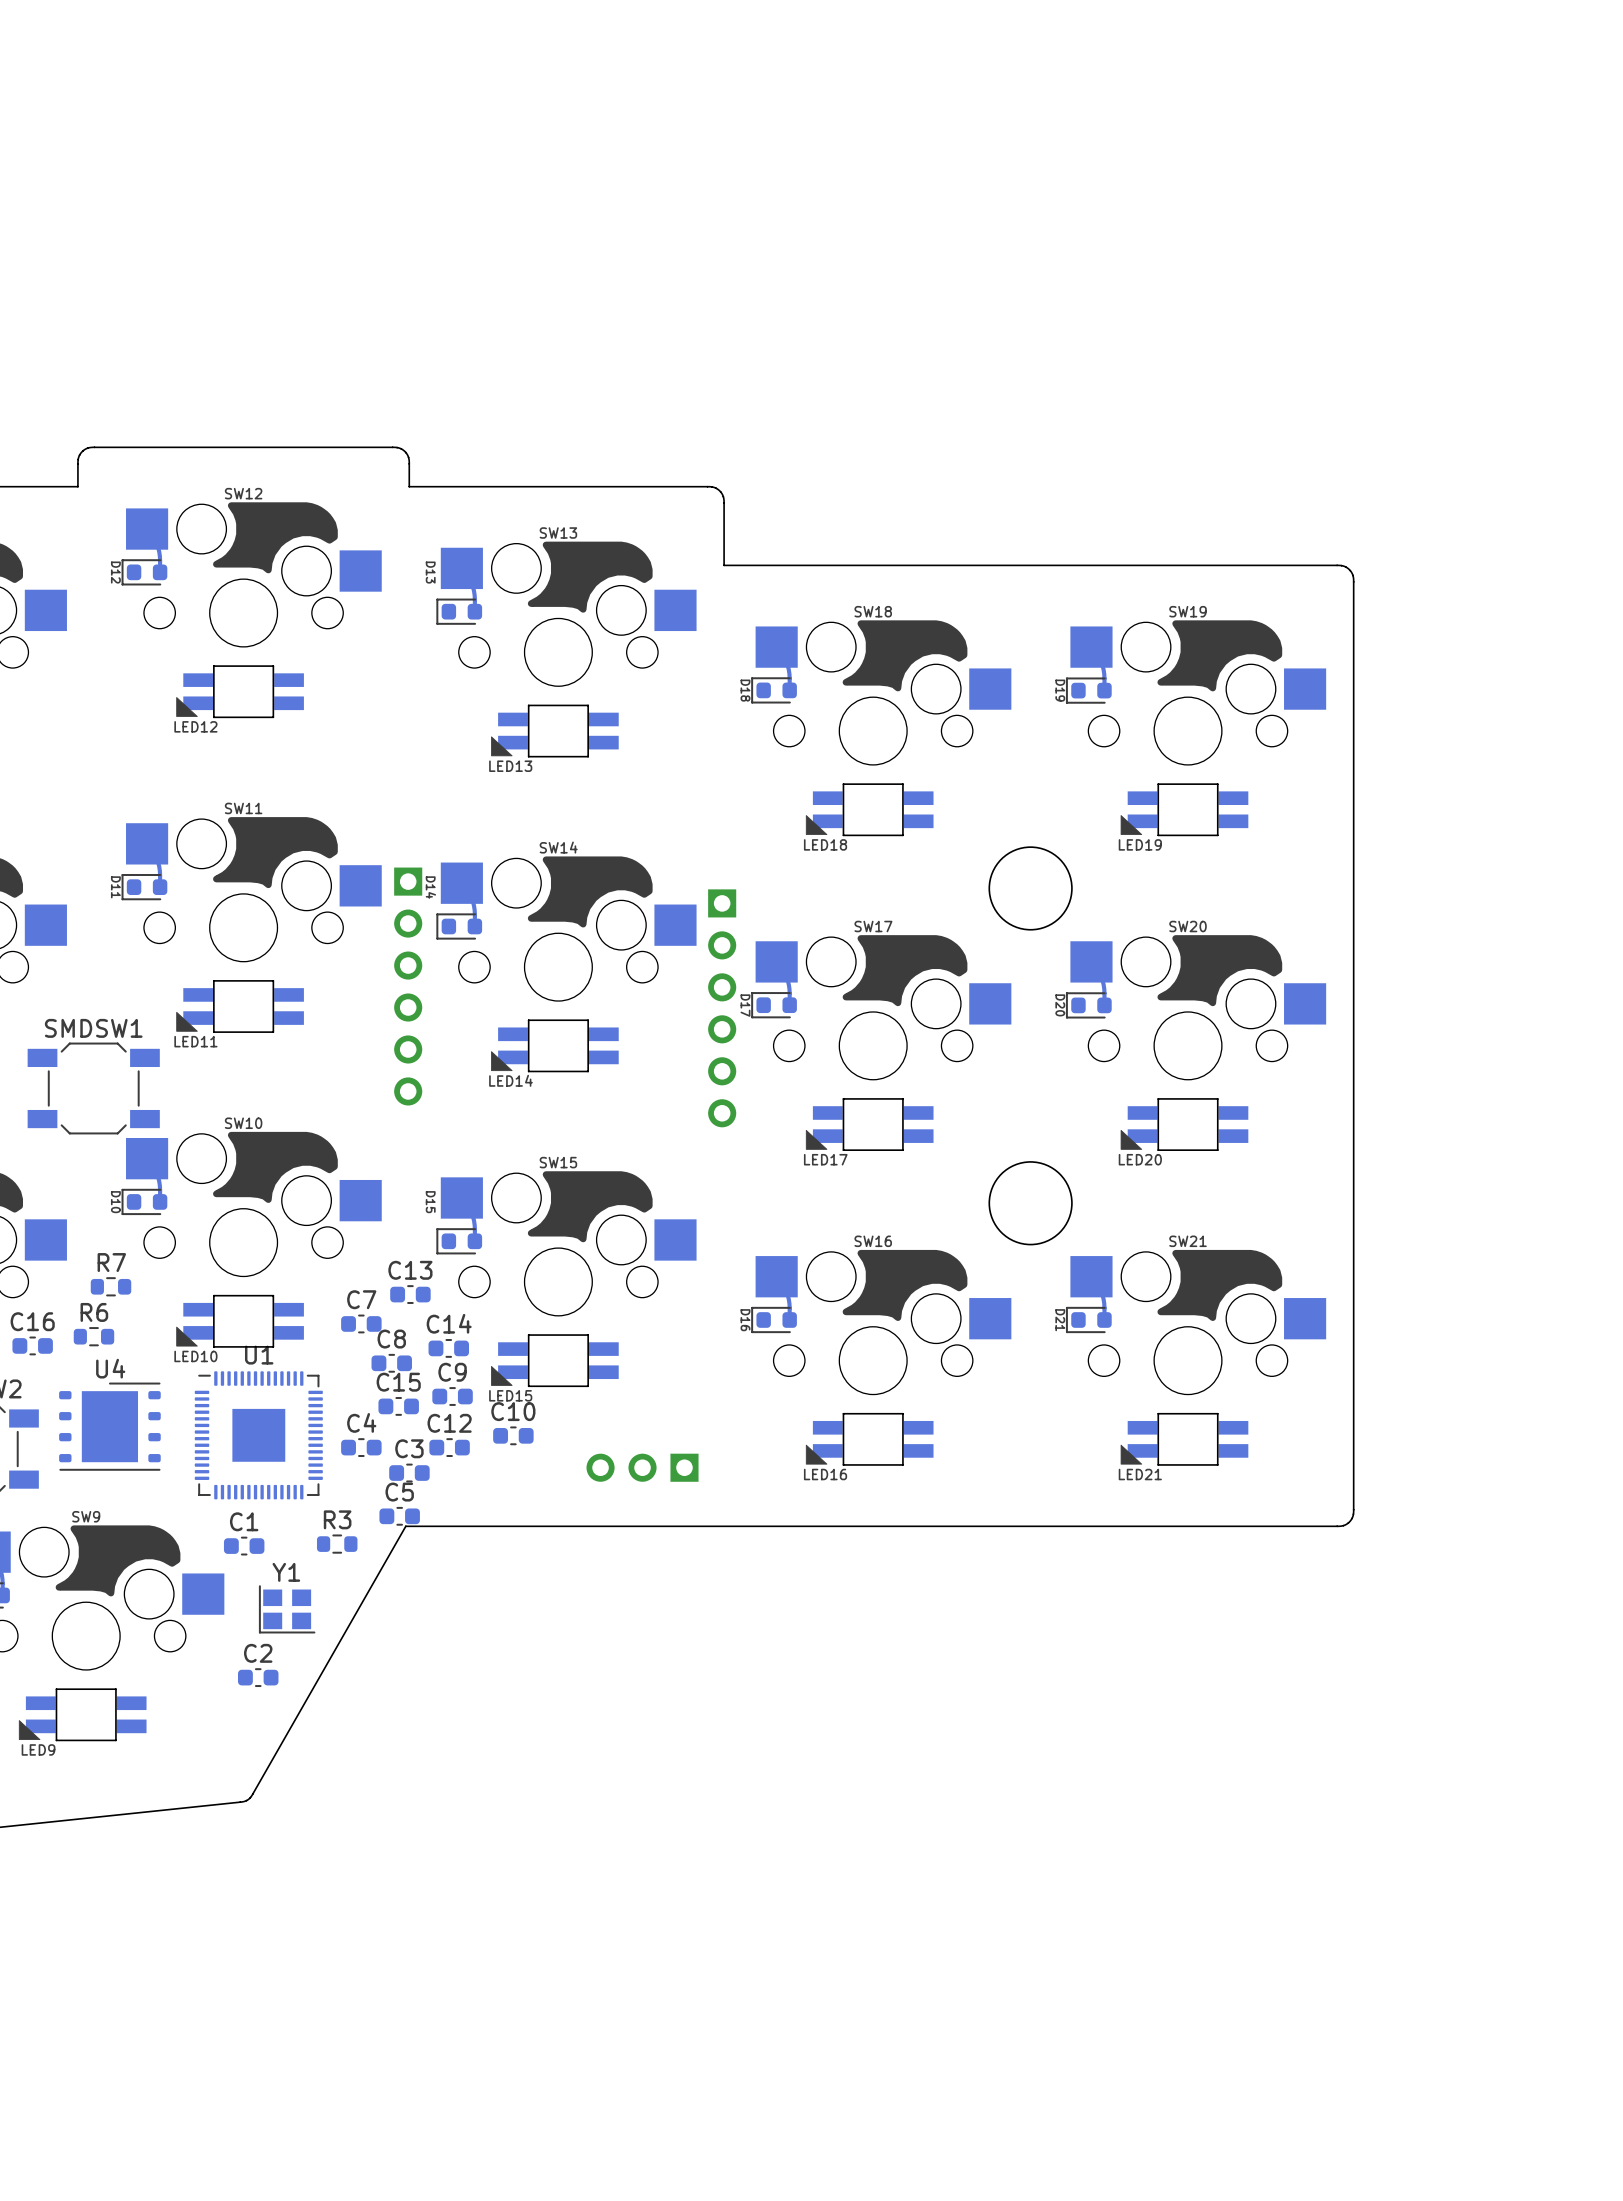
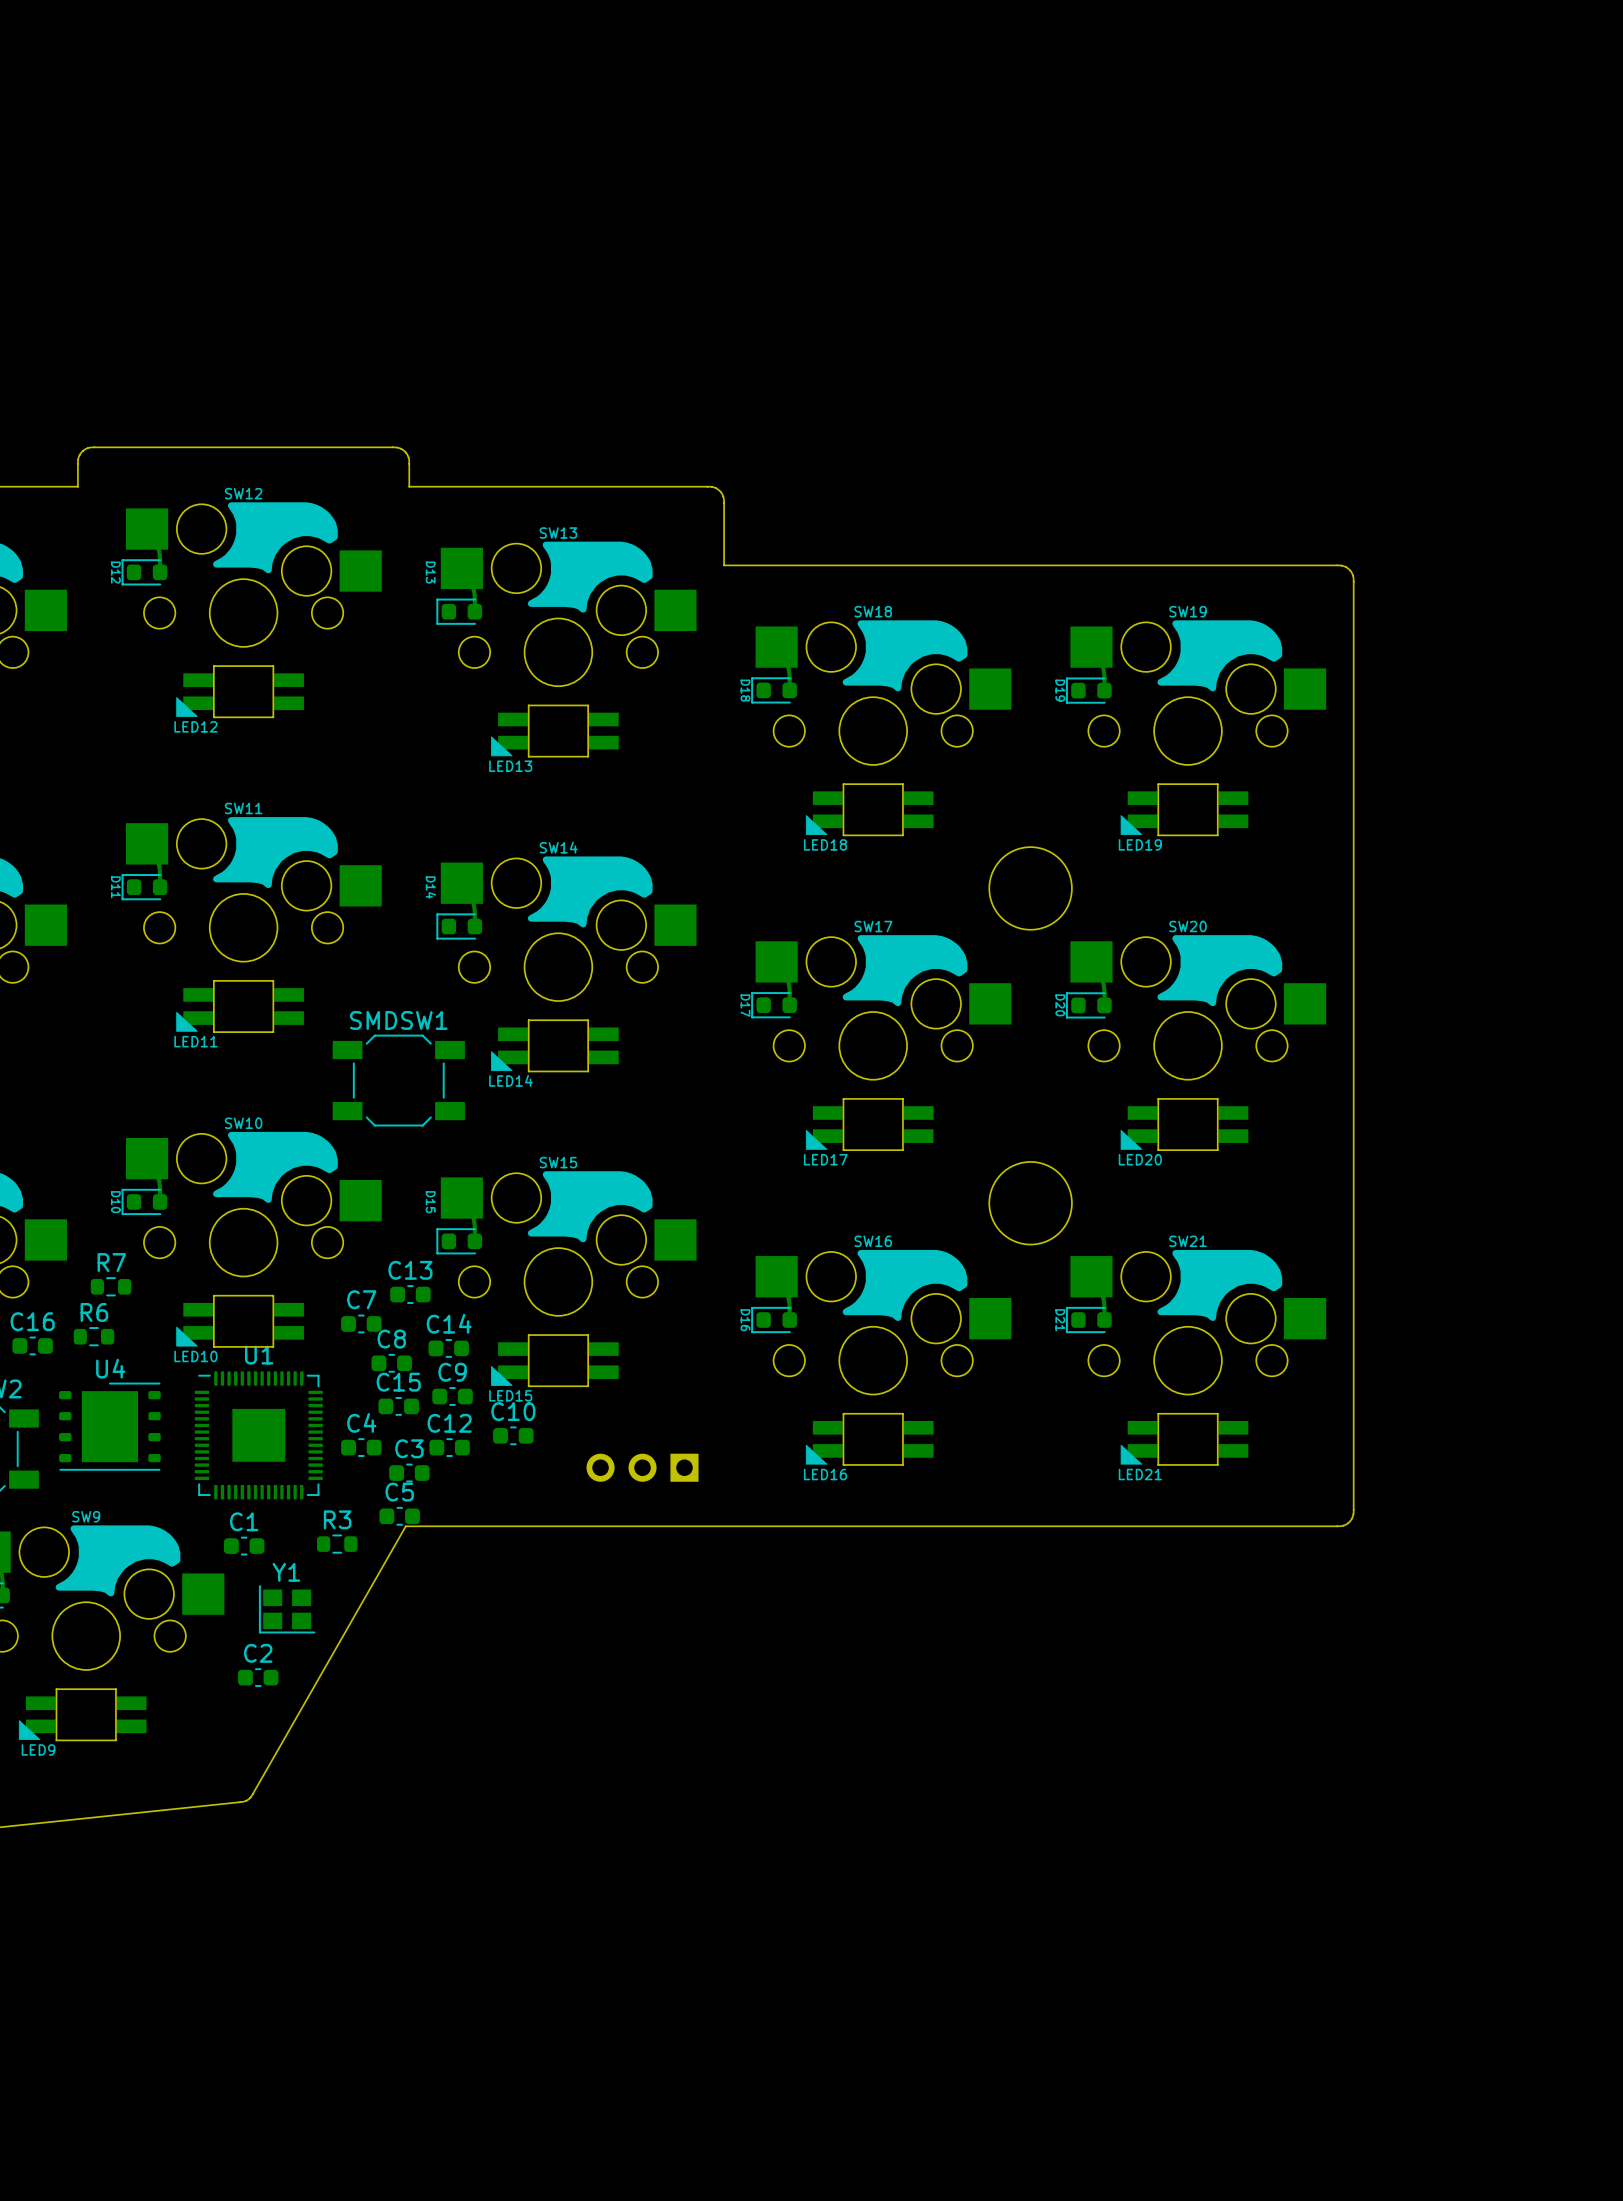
part: (408, 986) -> none
part: (722, 1008) -> none
SMDSW1 position: (93, 1088) -> (398, 1080)

